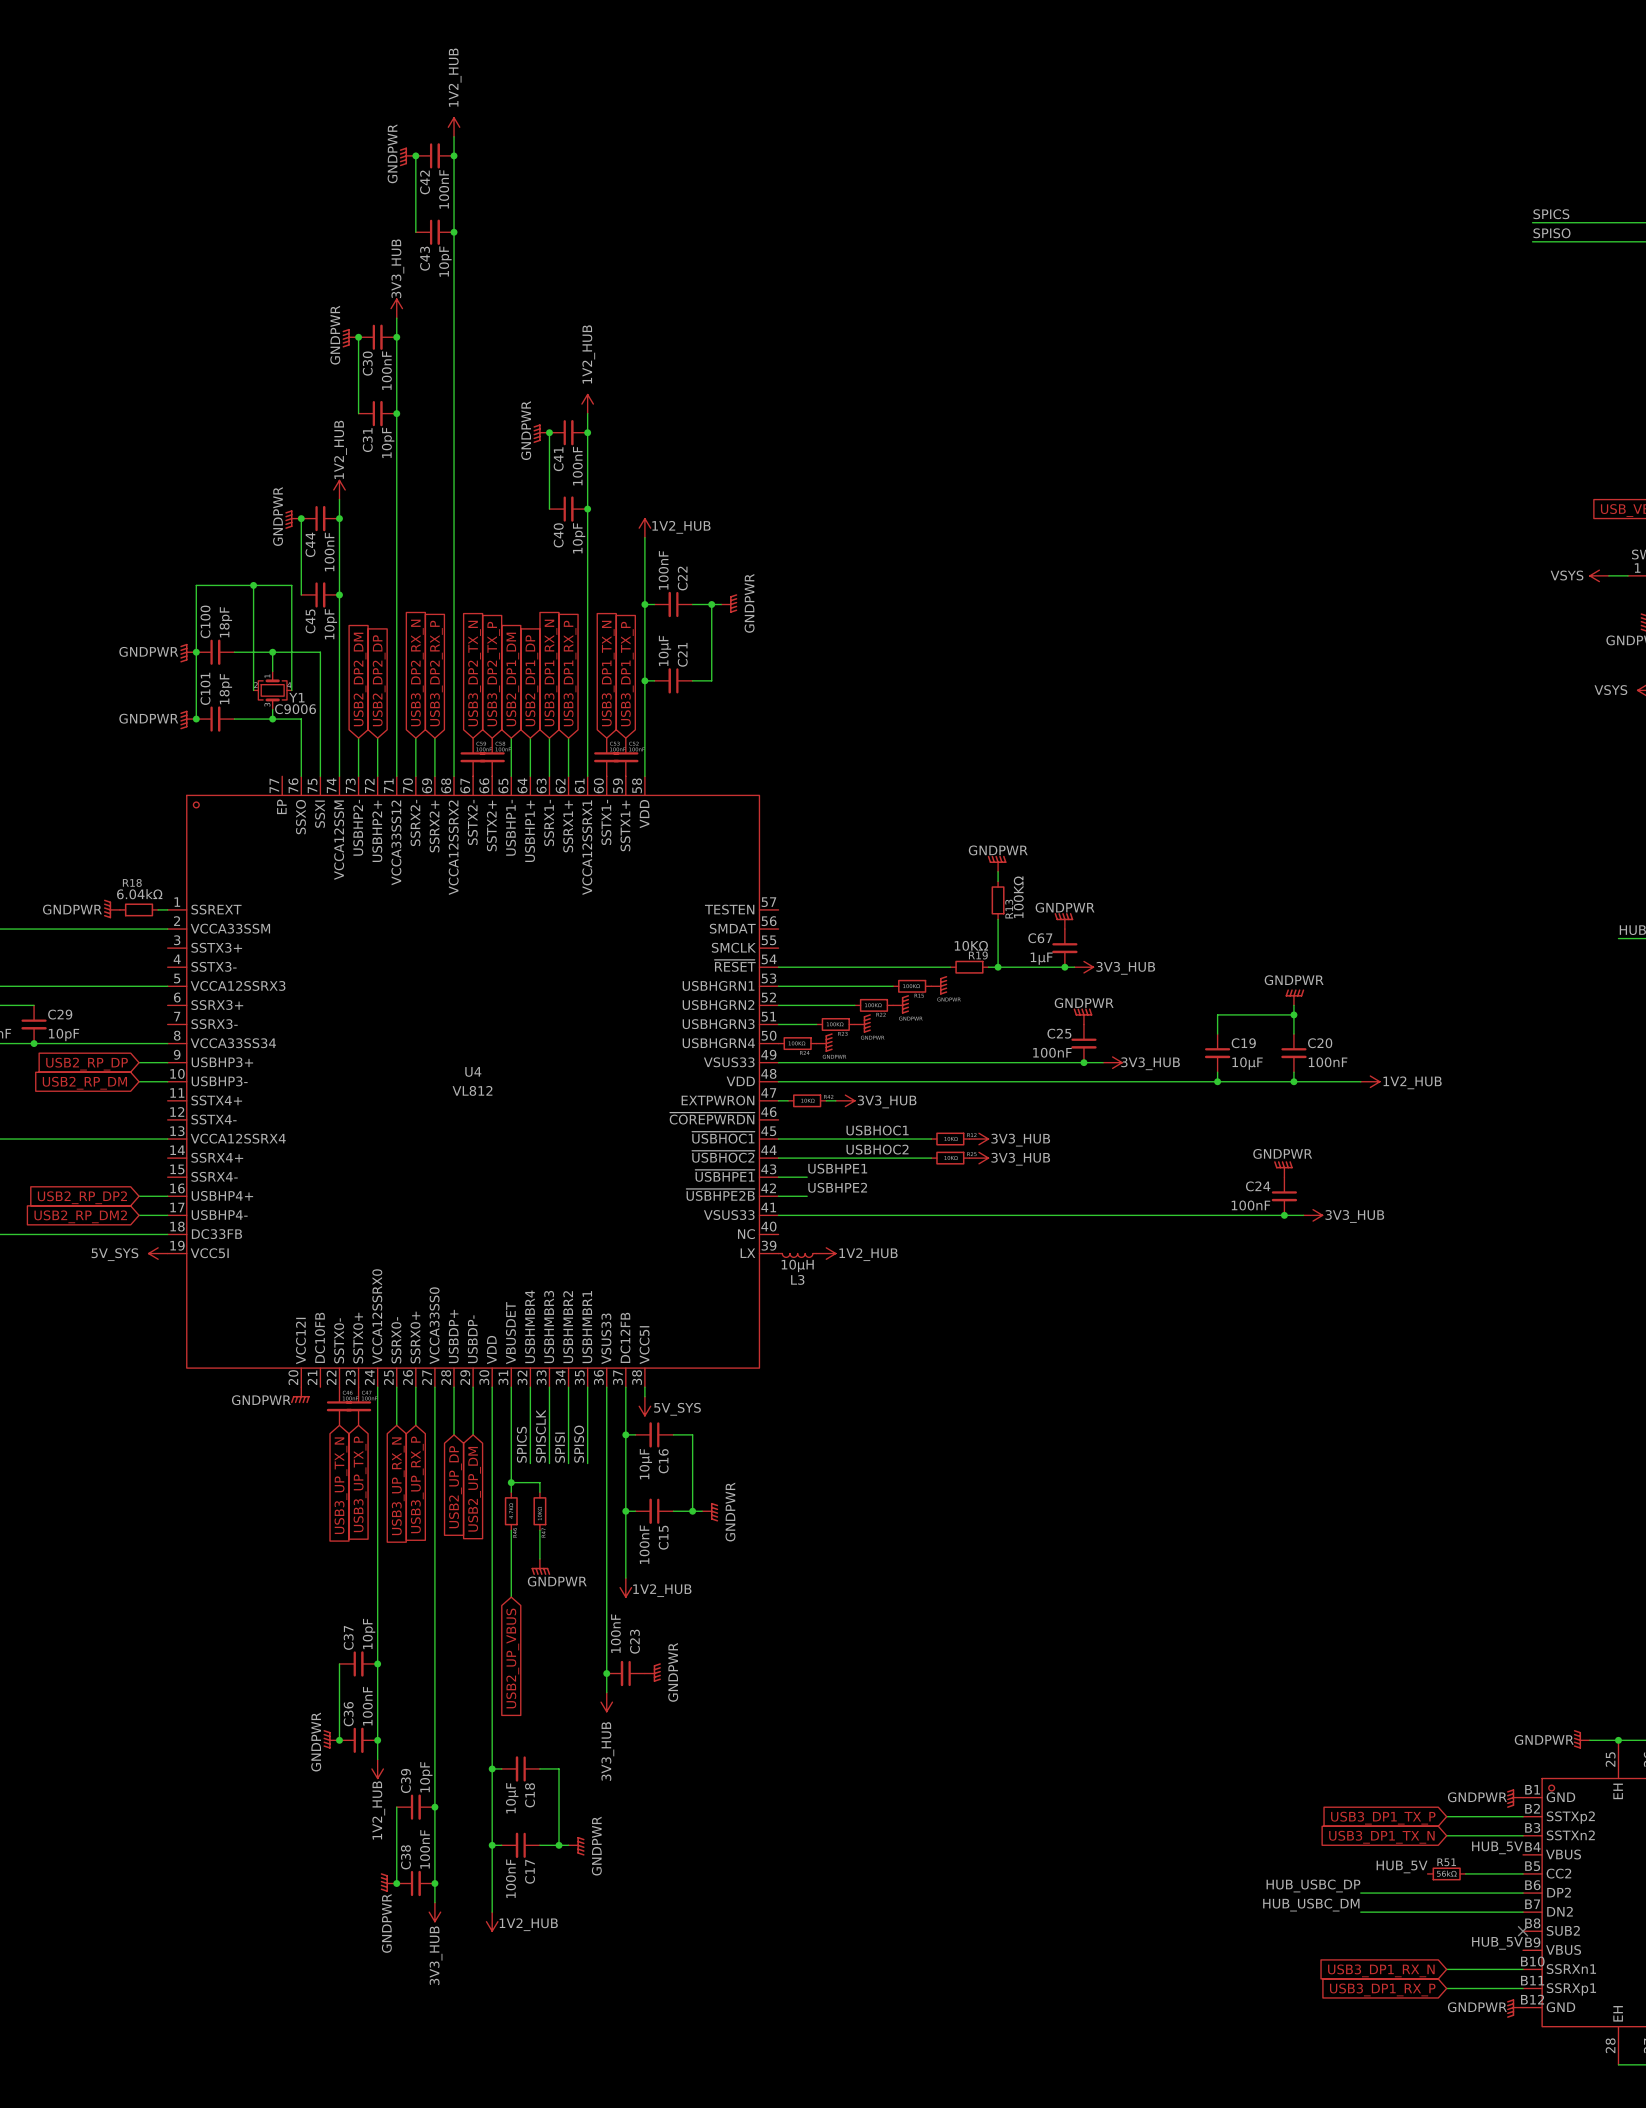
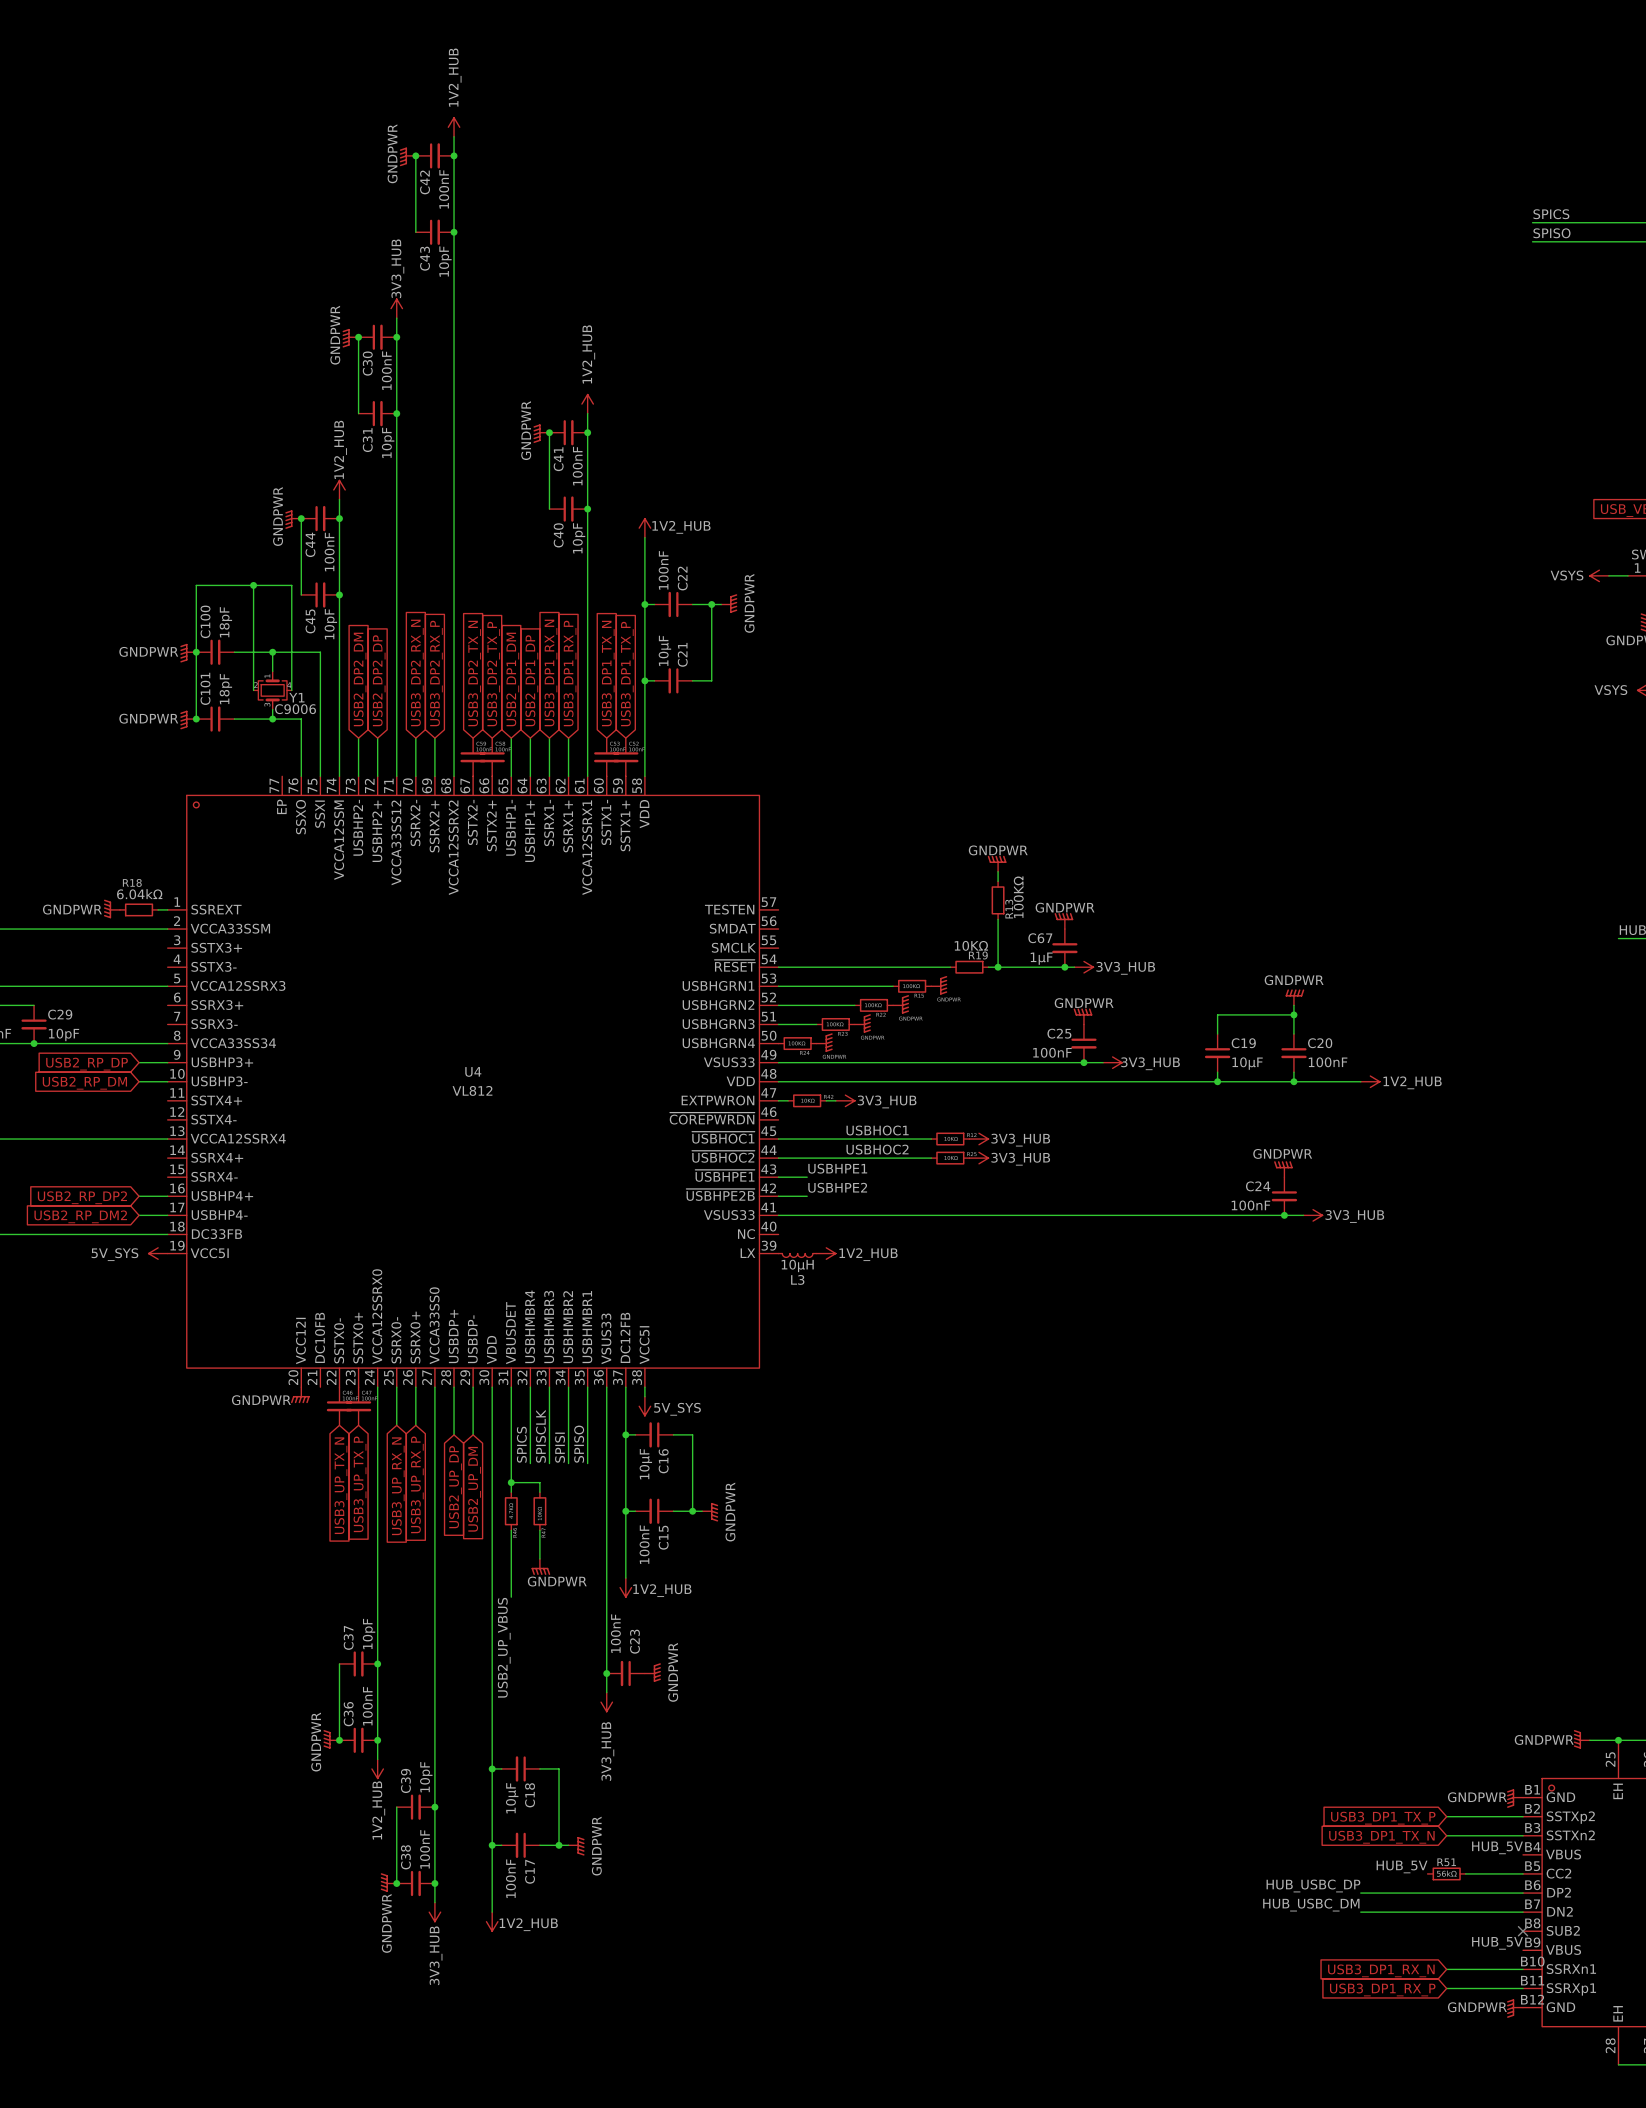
label: none -> USB2_UP_VBUS (504, 1647)
global label: USB2_UP_VBUS (512, 1658) -> none

